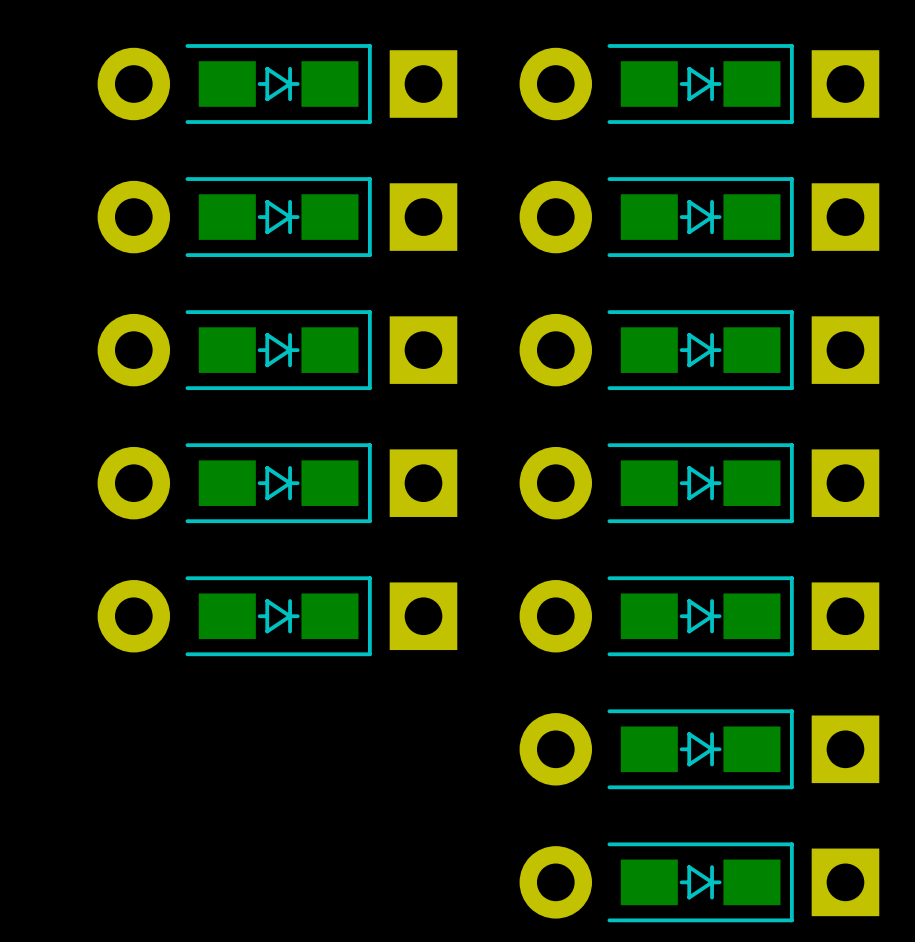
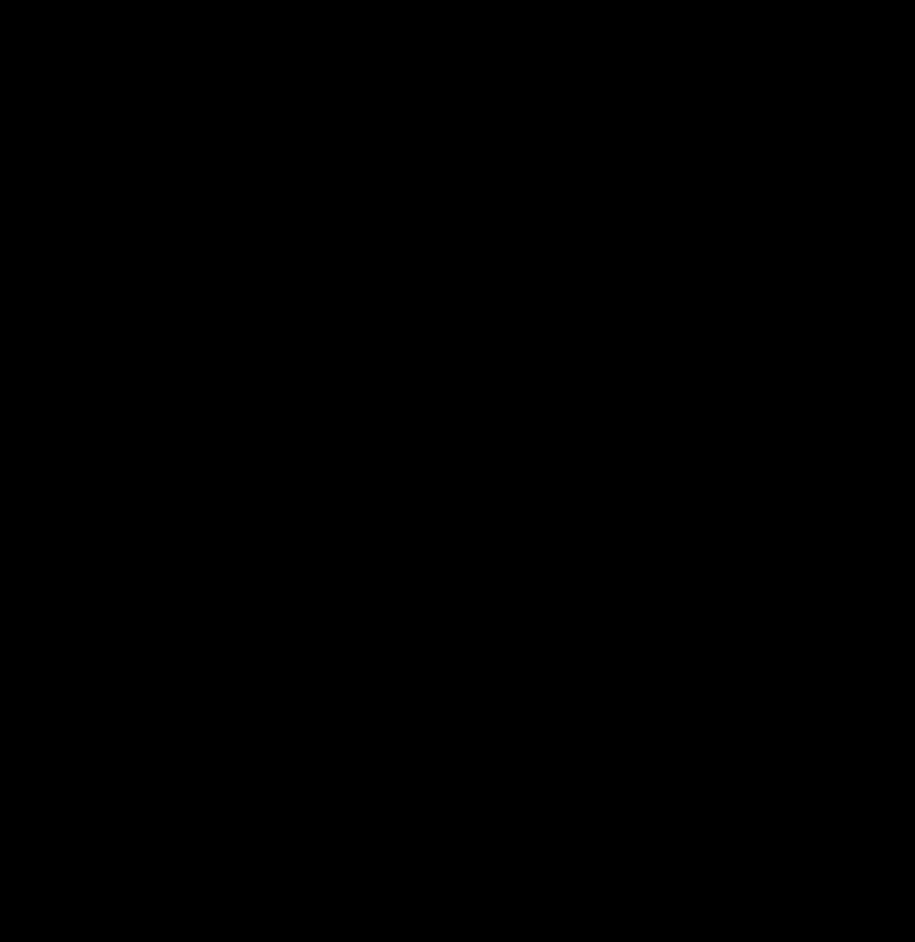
part: (277, 84) -> none
part: (699, 84) -> none
part: (277, 217) -> none
part: (699, 217) -> none
part: (277, 350) -> none
part: (699, 350) -> none
part: (277, 483) -> none
part: (699, 483) -> none
part: (277, 616) -> none
part: (699, 616) -> none
part: (699, 749) -> none
part: (699, 882) -> none

